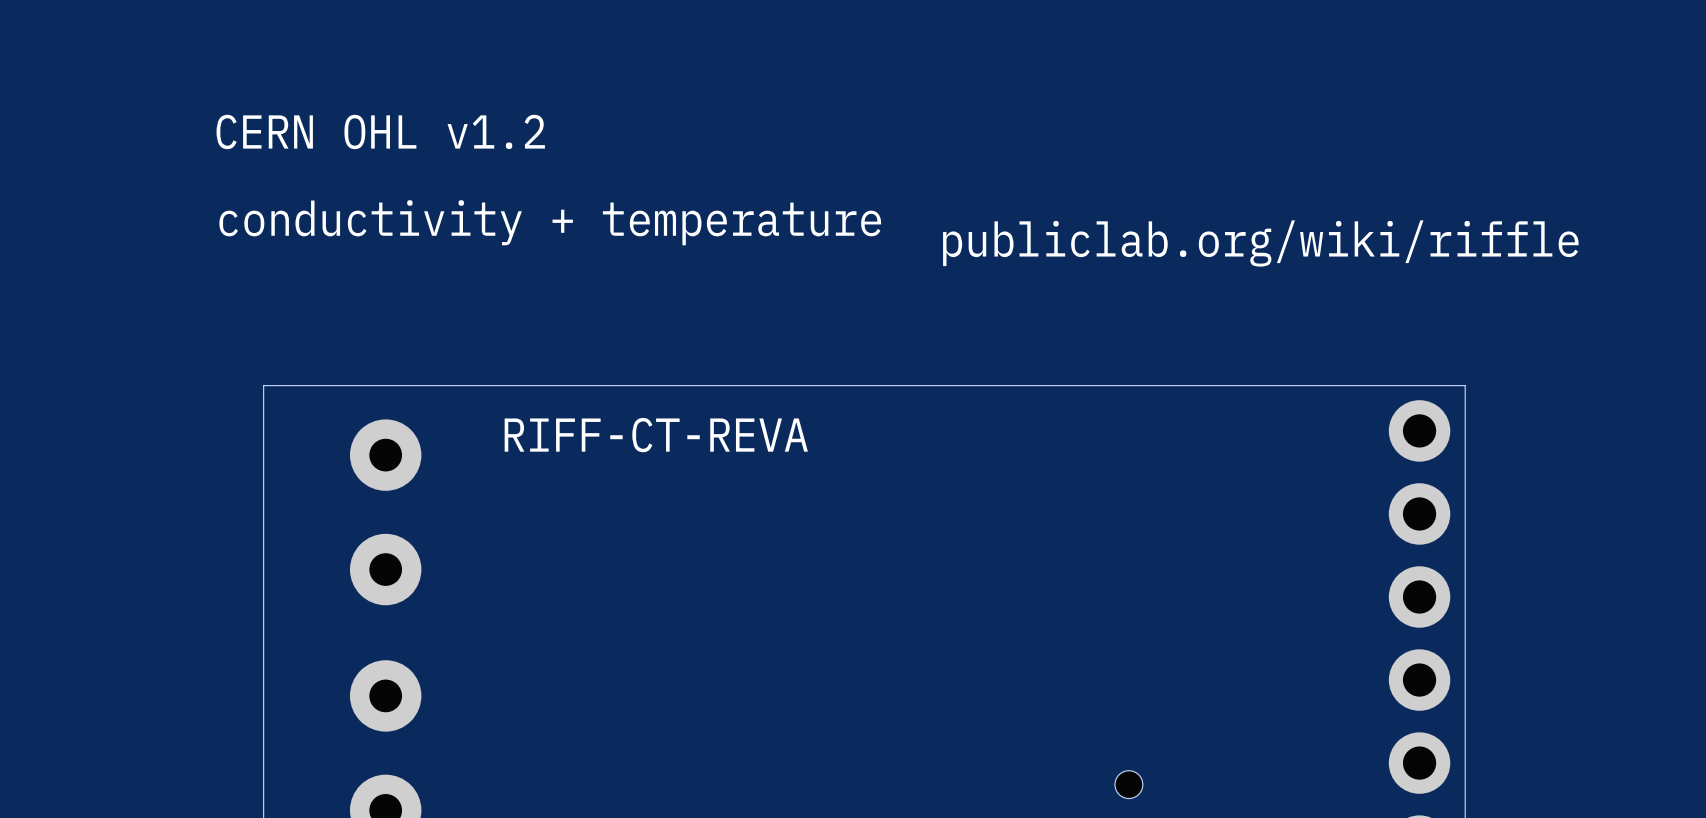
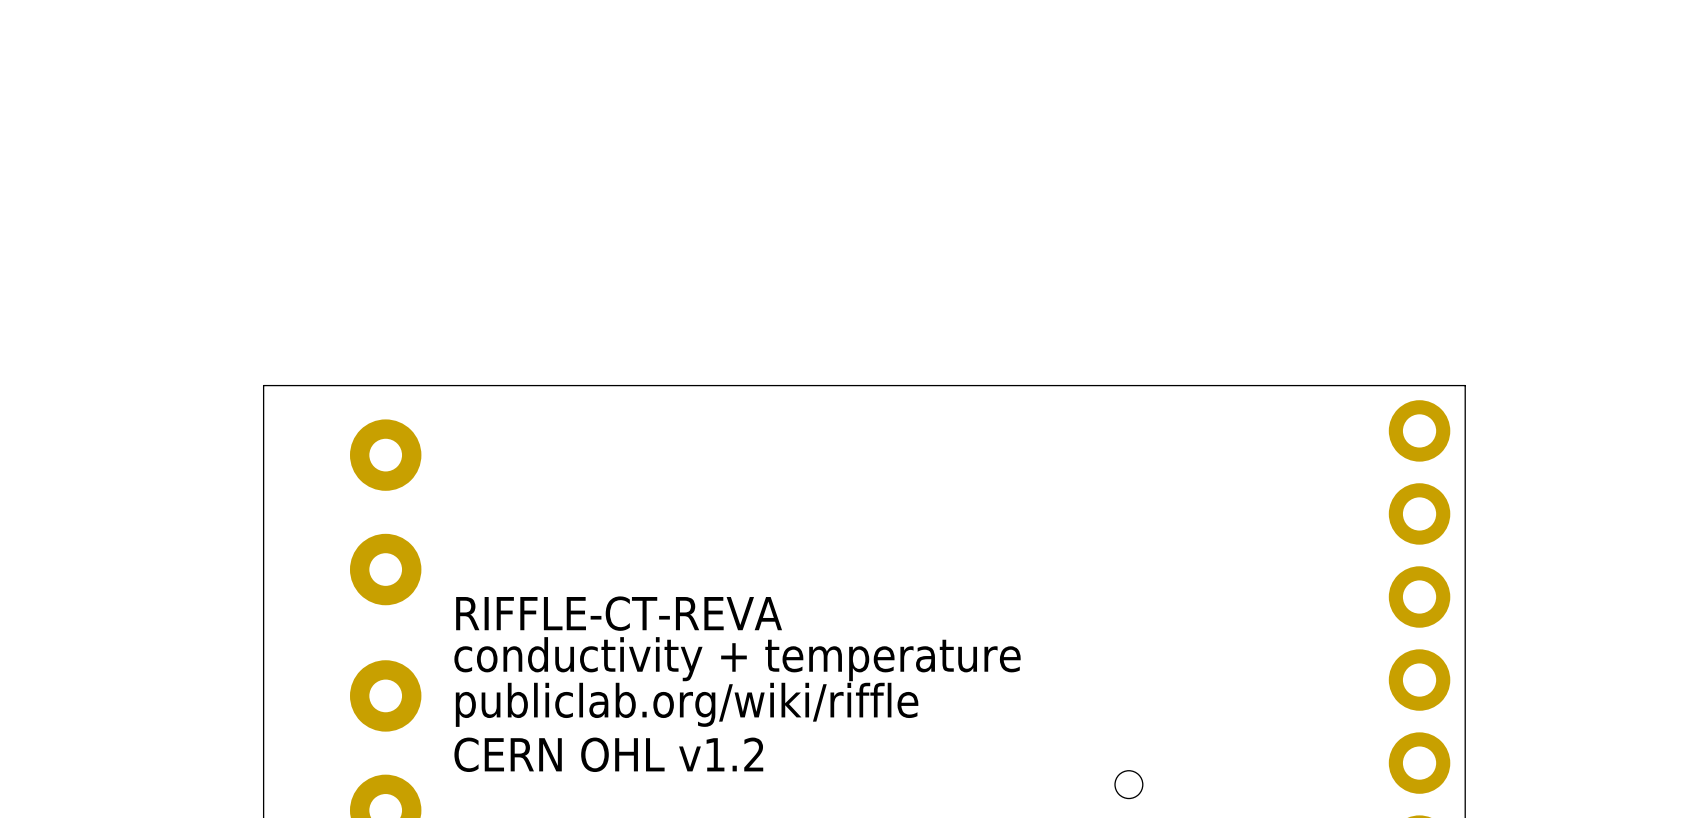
text position: CERN OHL v1.2 (380, 131) -> CERN OHL v1.2 (608, 754)
text position: conductivity + temperature (550, 222) -> conductivity + temperature (737, 659)
text: publiclab.org/wiki/riffle (1260, 243) -> none
text: RIFF-CT-REVA (656, 435) -> none
text: none -> RIFFLE-CT-REVA (619, 613)
text: none -> publiclab.org/wiki/riffle (687, 704)

